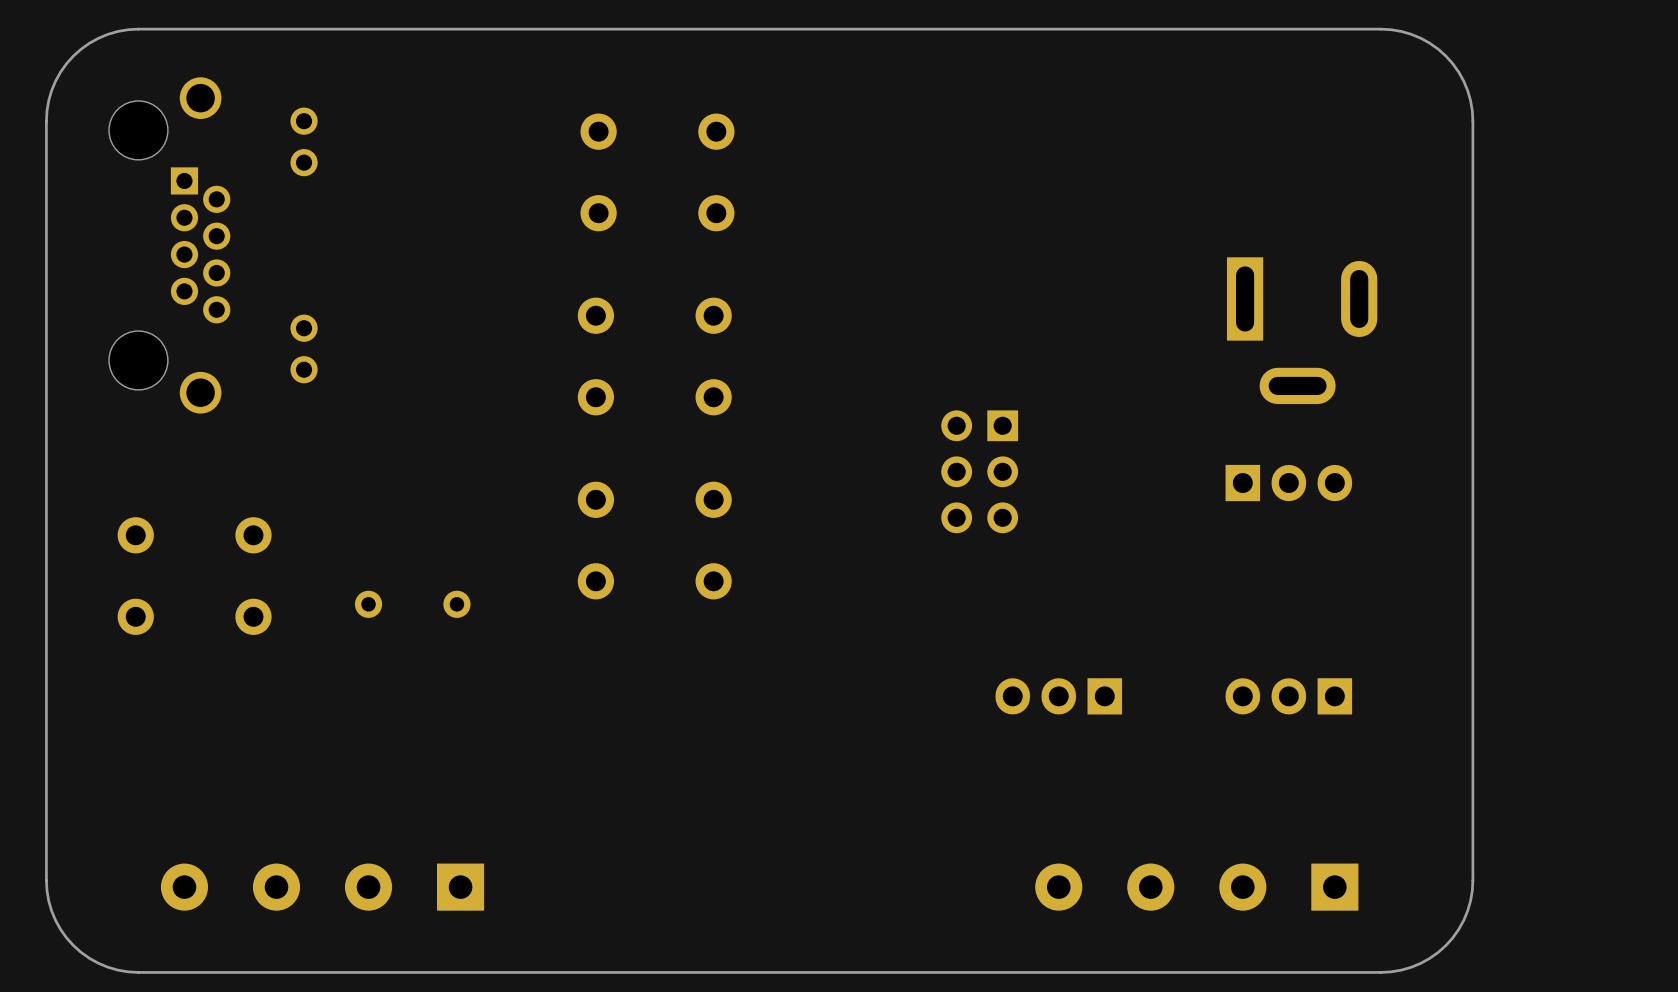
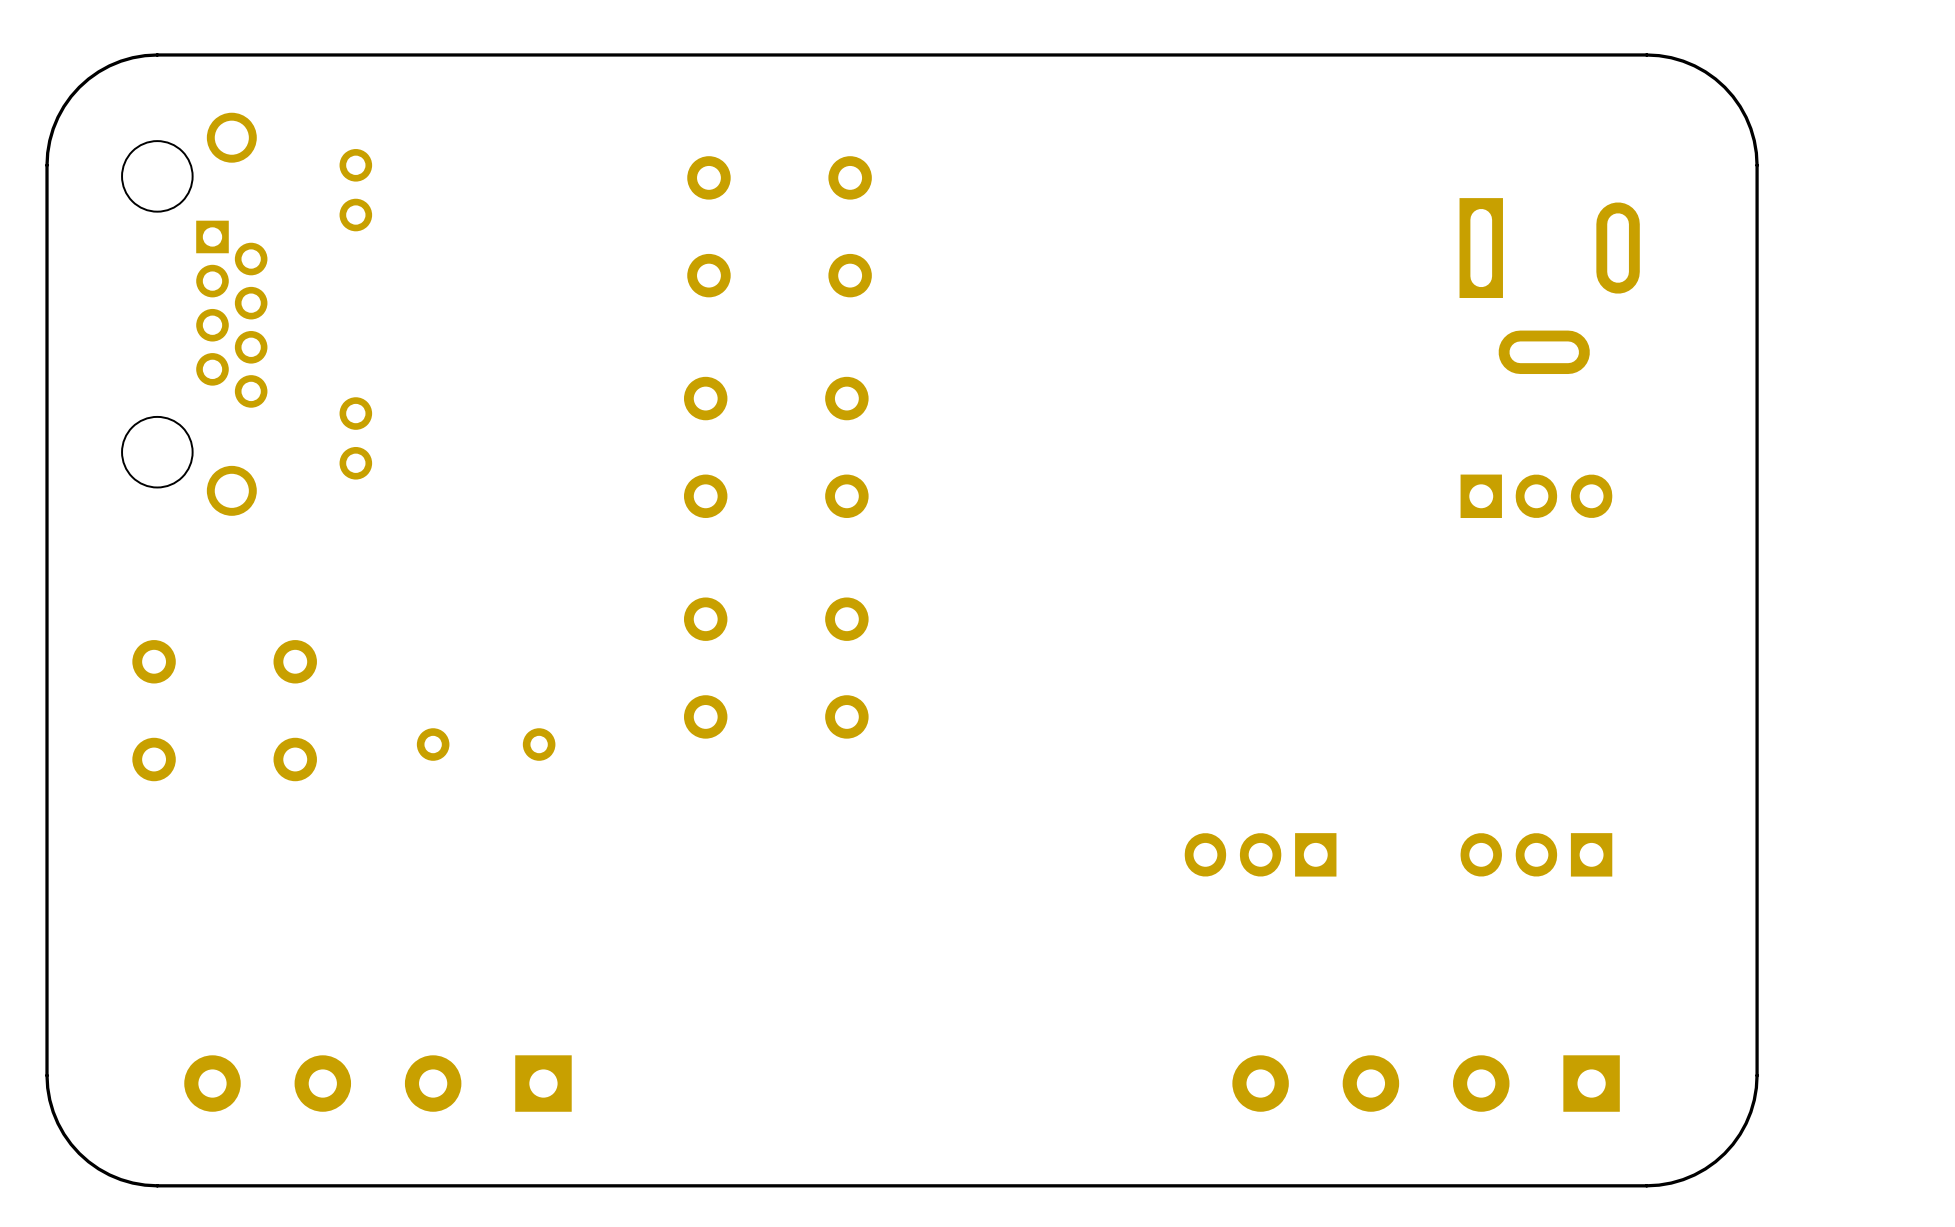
part position: (1302, 330) -> (1549, 286)
part: (979, 471) -> none
part position: (1288, 483) -> (1536, 496)

